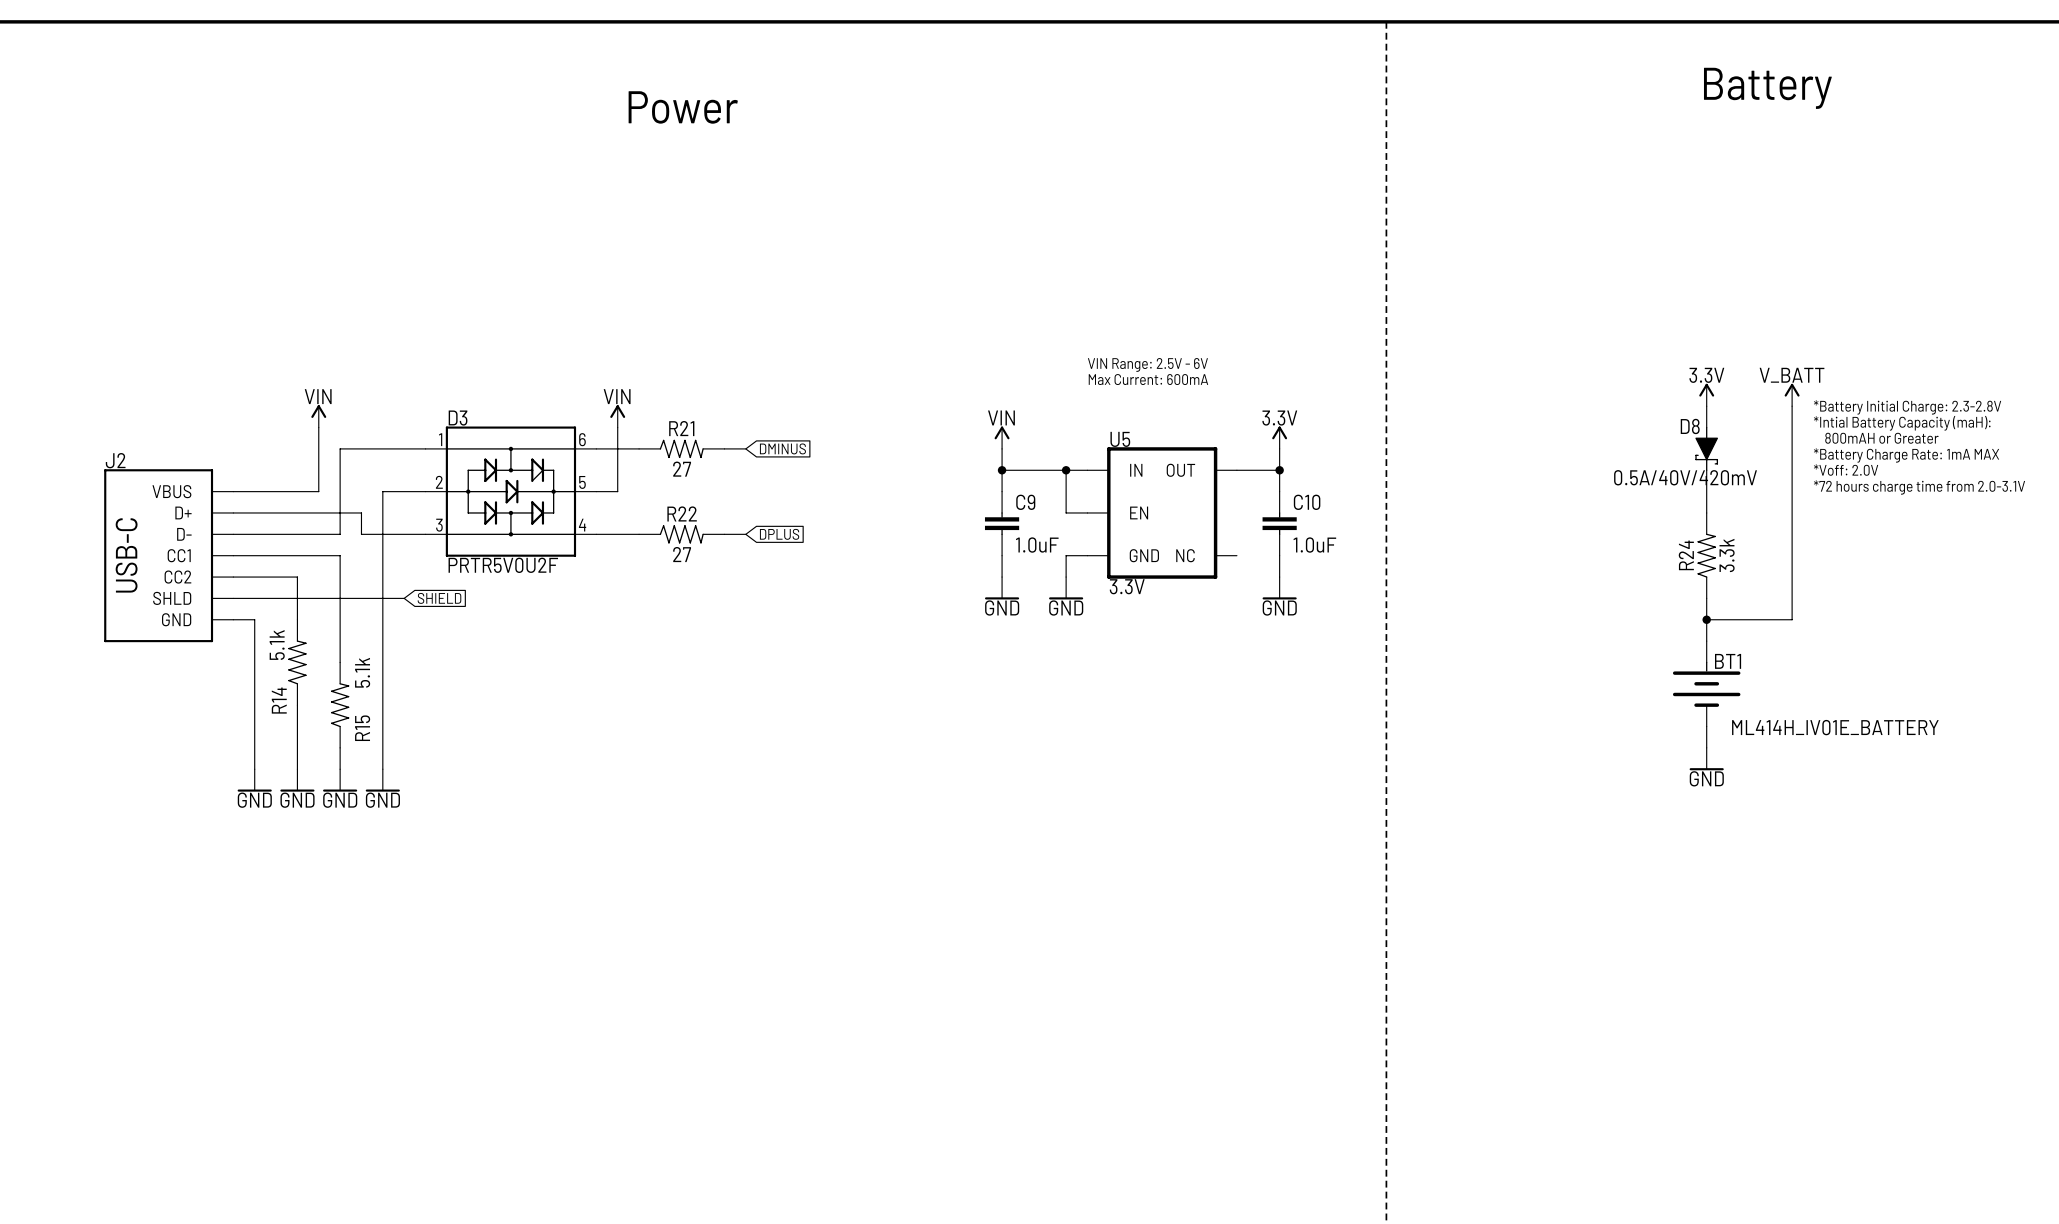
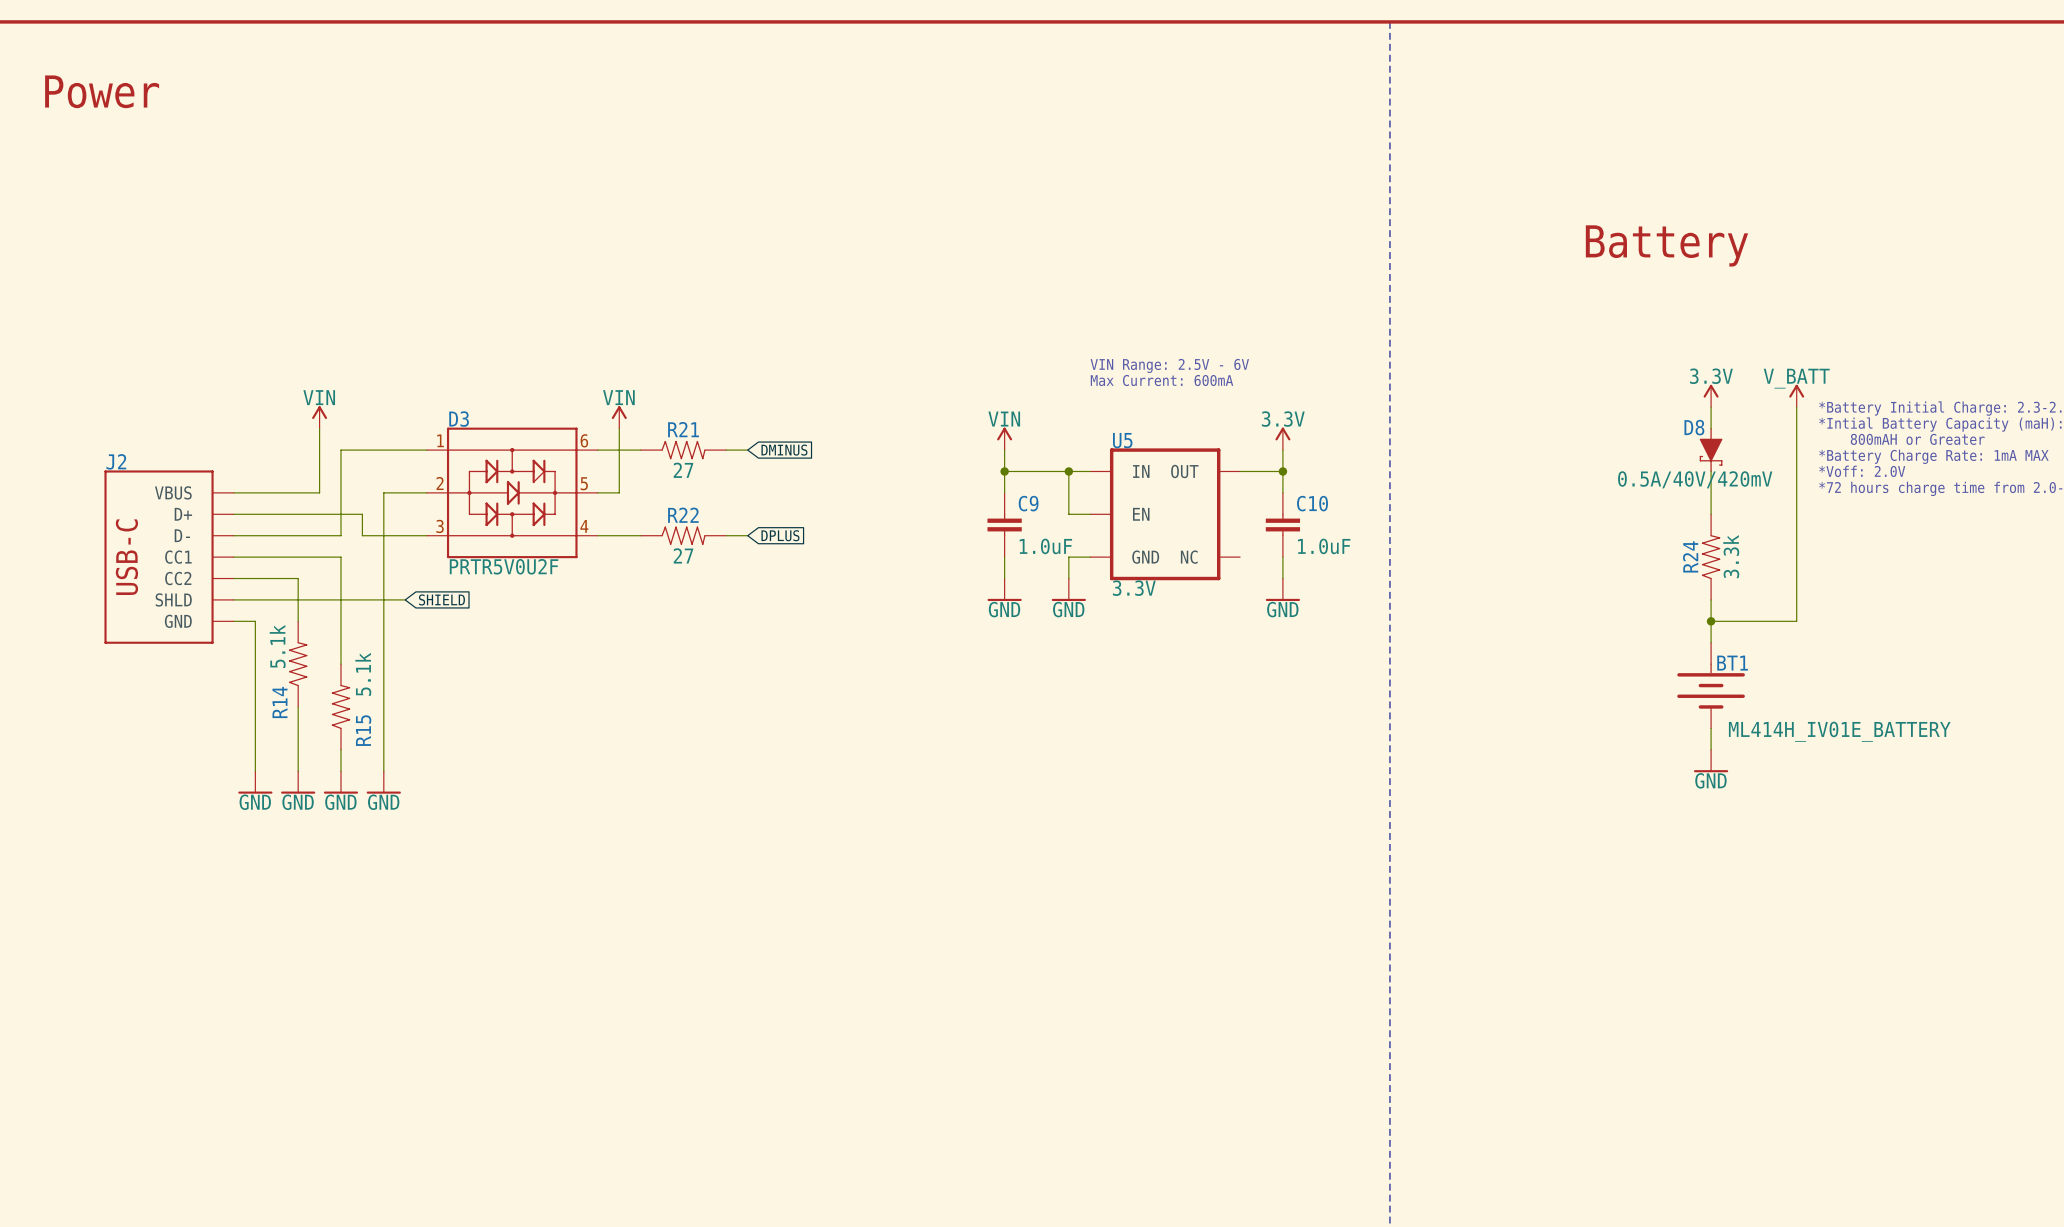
text: Battery (1767, 88) -> none
text: none -> Power (102, 91)
text: Power (683, 107) -> none
text: none -> Battery (1666, 245)

